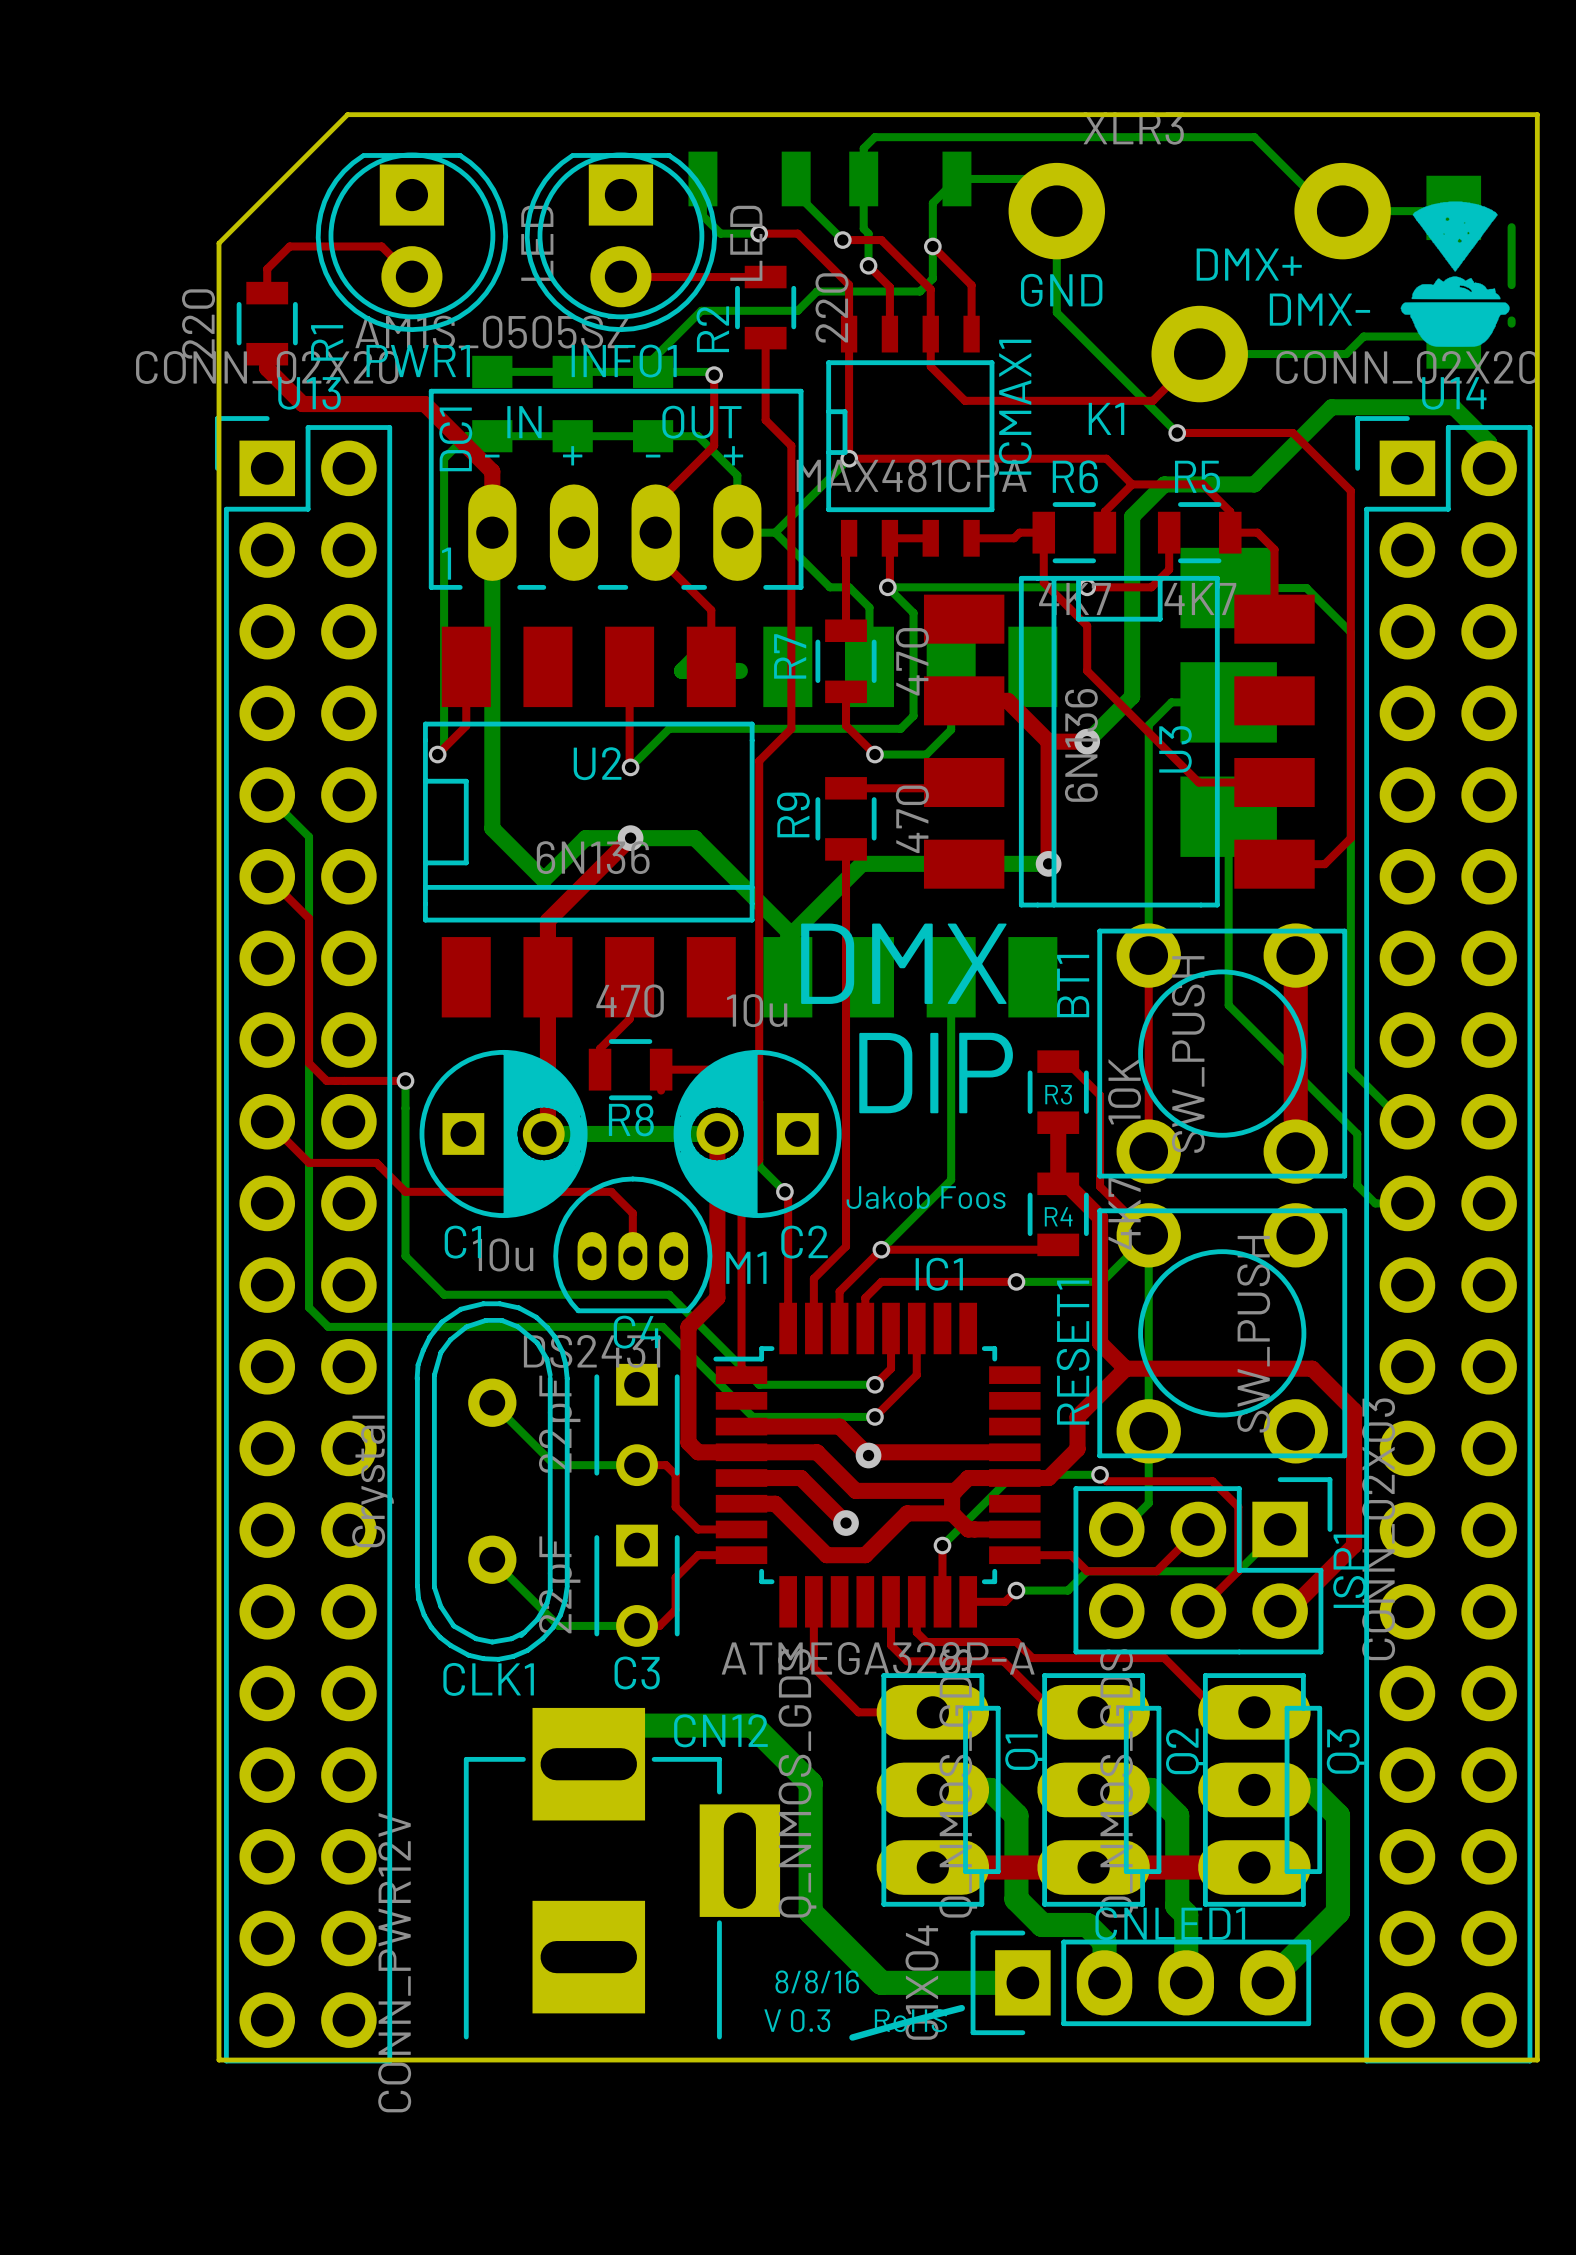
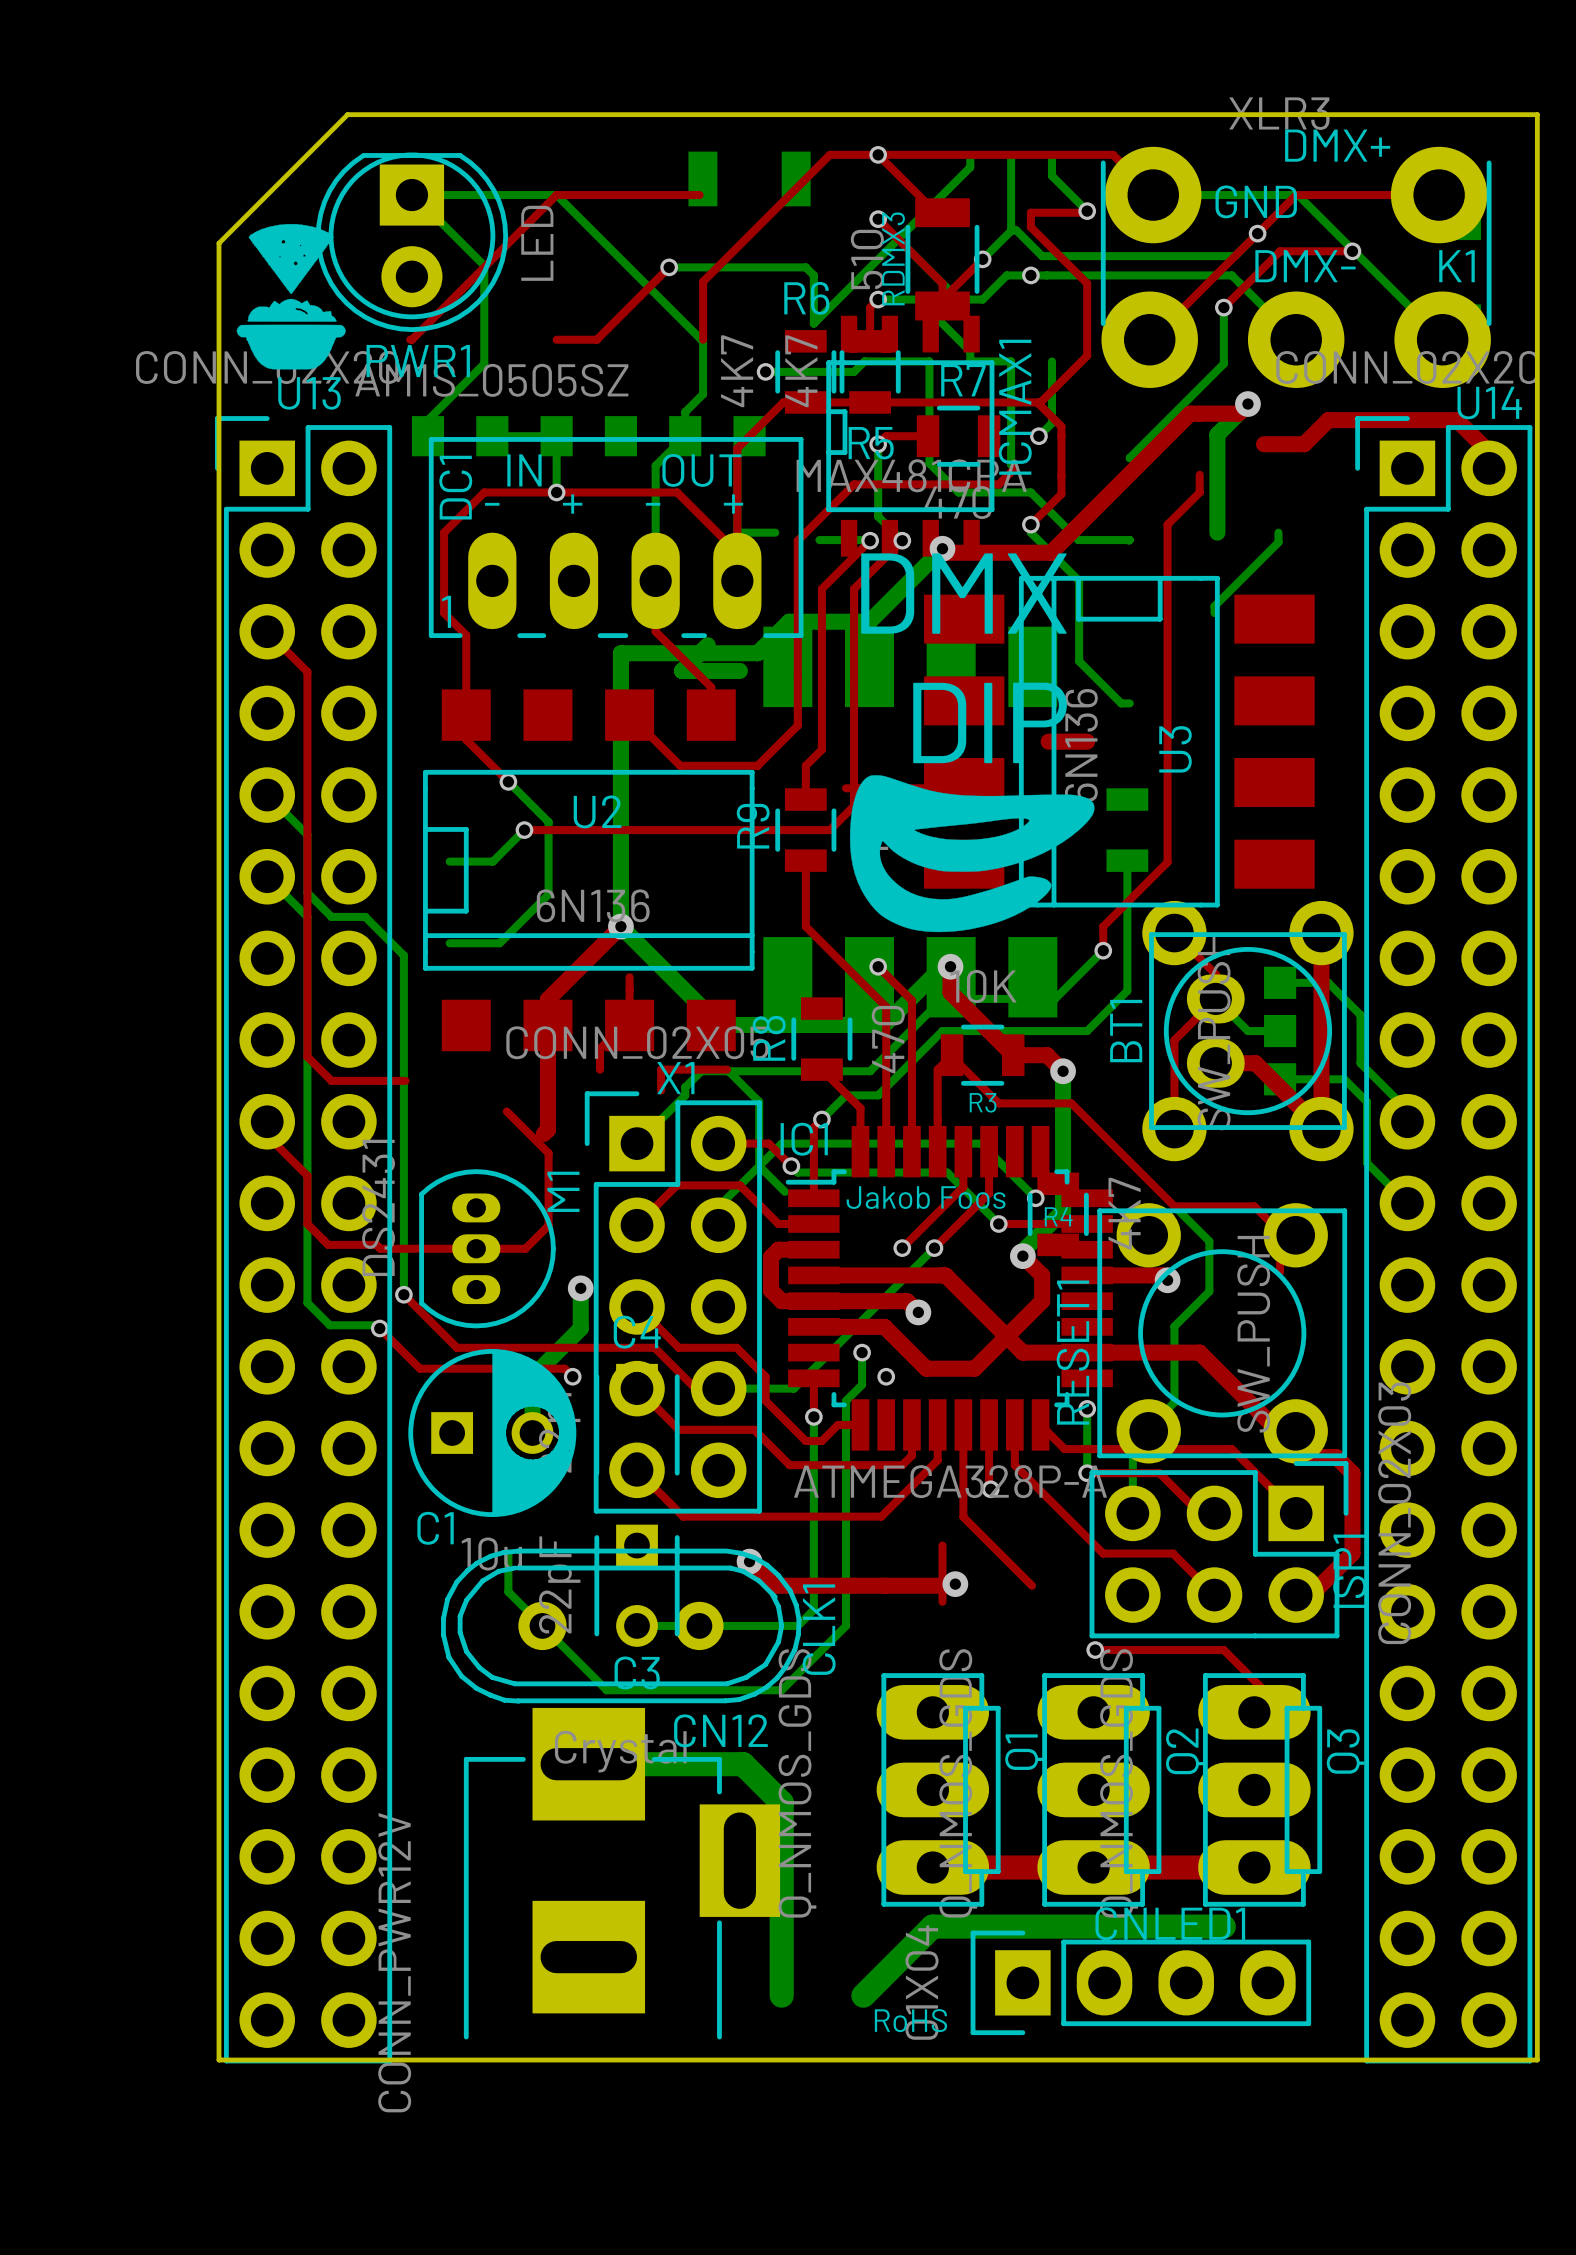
top track: none -> (878, 154) (936, 212) (942, 212)
via: none -> (878, 154)
bottom track: none -> (970, 157) (970, 167) (813, 323) (813, 275) (805, 267) (669, 267)
bottom track: none -> (1011, 157) (1011, 230) (982, 259)
bottom track: none -> (1051, 157) (1051, 175) (1087, 211)
K1 footprint: [1008, 162, 1391, 403] -> [1100, 146, 1492, 388]
bottom track: (702, 178) (702, 215) (720, 233) (759, 233) -> none
bottom track: (796, 178) (796, 193) (842, 240) -> none
RDMX3 side: bottom (910, 178) -> top (942, 259)
top track: none -> (699, 195) (556, 195) (410, 339)
bottom track: none -> (1153, 195) (1297, 195) (1442, 339)
top track: none -> (1153, 195) (1113, 154) (829, 154) (703, 281) (703, 339)
top track: none -> (1439, 195) (1296, 195) (1149, 339)
drawing: [1400, 201, 1510, 347] -> none
bottom track: (1453, 207) (1450, 211) (1328, 211) (1254, 137) (874, 137) (863, 148) (863, 228) (868, 233) (868, 265) -> none
top track: none -> (1087, 211) (1085, 212) (1030, 212) (1030, 227) (1087, 283) (1087, 355) (1040, 402) (783, 402) (737, 448) (737, 580)
via: none -> (1087, 211)
top track: none -> (878, 219) (942, 283) (942, 305)
via: none -> (878, 219)
drawing: none -> [236, 224, 346, 370]
bottom track: (1511, 227) (1511, 285) -> none
bottom track: none -> (1011, 230) (1016, 230) (1042, 256) (1235, 256) (1257, 233)
top track: (759, 233) (797, 233) (849, 284) (849, 458) -> none
via: (759, 233) -> none
via: none -> (1257, 233)
bottom track: none -> (898, 239) (958, 299) (982, 299) (1006, 275) (1231, 275) (1296, 339)
top track: (842, 240) (881, 240) (930, 289) (930, 366) (964, 400) (1152, 400) (1199, 354) -> none
via: (842, 240) -> none
INFO1: LED (620, 242) -> none
top track: (932, 246) (971, 285) (971, 334) -> none
via: (932, 246) -> none
top track: none -> (1352, 251) (1280, 251) (1223, 307)
via: none -> (1352, 251)
top track: none -> (982, 259) (942, 299)
via: none -> (982, 259)
top track: (868, 265) (889, 287) (889, 334) -> none
via: (868, 265) -> none
top track: none -> (669, 267) (596, 339) (556, 339)
via: none -> (669, 267)
via: none -> (1030, 275)
top track: (411, 276) (381, 246) (289, 246) (267, 269) (267, 293) -> none
top track: (621, 277) (765, 277) -> none
bottom track: none -> (878, 299) (918, 299) (970, 351) (970, 361) (1011, 361) (1011, 464) (1014, 468)
top track: none -> (878, 299) (870, 307) (870, 341)
via: none -> (878, 299)
R2 side: top (765, 307) -> bottom (1127, 830)
bottom track: none -> (1223, 307) (1223, 363) (1129, 457)
via: none -> (1223, 307)
bottom track: (1511, 320) (1511, 323) -> none
R1: 220 (267, 323) -> none
bottom track: (1453, 336) (1363, 336) (1346, 354) (1199, 354) -> none
top track: (765, 338) (765, 420) (791, 445) (791, 728) (759, 760) (759, 1159) (741, 1177) (741, 1375) -> none
top track: (267, 354) (267, 368) (302, 404) (424, 404) (492, 471) (492, 532) -> none
bottom track: none -> (1051, 361) (1051, 423) (1038, 436)
bottom track: (492, 371) (710, 371) (714, 375) -> none
bottom track: (653, 371) (653, 359) (701, 310) (797, 310) (817, 291) (919, 291) (932, 278) (932, 203) (956, 178) (1024, 178) (1056, 211) (1056, 312) (1177, 432) -> none
bottom track: none -> (765, 371) (854, 371) (864, 361) (929, 361) (929, 463) (958, 492) (1030, 492) (1078, 540) (1129, 540)
top track: (714, 375) (714, 445) (655, 504) (655, 554) (711, 610) (711, 666) -> none
via position: (714, 375) -> (765, 371)
U14 name position: U14 (1454, 393) -> U14 (1489, 403)
top track: none -> (1038, 402) (1061, 426) (1061, 494) (1030, 524)
part rotation: 0° (492, 404) -> 90° clockwise (460, 436)
part: (572, 404) -> none
part: (653, 404) -> none
bottom track: none -> (1247, 404) (1217, 434) (1217, 532)
top track: none -> (1247, 404) (1238, 413) (1190, 413) (1051, 552) (946, 552) (942, 548)
via: none -> (1247, 404)
K1 name position: K1 (1106, 418) -> K1 (1456, 266)
top track: (1177, 432) (1292, 432) (1350, 490) (1350, 838) (1324, 864) (1274, 864) -> none
via: (1177, 432) -> none
bottom track: none -> (428, 436) (428, 420) (484, 363) (484, 265) (413, 195) (556, 195) (703, 339) (703, 394) (685, 412) (685, 436) (655, 465) (655, 580)
bottom track: (492, 436) (466, 436) (444, 458) (444, 748) (437, 754) -> none
bottom track: (556, 436) (698, 436) (737, 475) -> (556, 436) (556, 492)
part: none -> (588, 436)
part: none -> (717, 436)
top track: none -> (928, 436) (886, 436) (878, 444)
via: none -> (1038, 436)
bottom track: none -> (878, 444) (878, 516) (902, 540)
top track: none -> (1263, 444) (1304, 444) (1328, 420) (1456, 420) (1489, 452) (1489, 468)
bottom track: (849, 458) (775, 532) (829, 587) (849, 587) (869, 607) (869, 666) -> none
top track: (849, 458) (1106, 458) (1132, 484) -> none
via position: (849, 458) -> (878, 444)
top track: none -> (1014, 468) (998, 484) (854, 484) (797, 540) (797, 725) (757, 765) (680, 765) (629, 715)
bottom track: (1489, 468) (1489, 442) (1453, 407) (1331, 407) (1254, 484) (1164, 484) (1132, 516) (1132, 696) (1087, 741) -> none
top track: none -> (1199, 474) (1199, 492) (1167, 524) (1167, 862) (1103, 926) (1103, 950)
R5 name position: R5 (1197, 476) -> R5 (871, 443)
top track: (1132, 484) (1104, 511) (1104, 532) -> none
top track: (1132, 484) (1202, 484) (1230, 511) (1230, 532) (1257, 532) (1274, 549) (1274, 619) -> none
DC1 position: (616, 489) -> (616, 537)
via: none -> (556, 492)
bottom track: none -> (1030, 524) (1030, 532) (1079, 580) (1079, 661) (1121, 703) (1129, 703)
via: none -> (1030, 524)
bottom track: (492, 532) (492, 828) (543, 879) (585, 838) (694, 838) (787, 931) (787, 977) -> none
R6 rotation: 0° (1074, 532) -> 90° clockwise (805, 371)
R6 position: (1074, 532) -> (805, 371)
top track: (1169, 532) (1169, 569) (1151, 587) (1087, 587) -> none
R5 rotation: 0° (1199, 532) -> 90° clockwise (870, 371)
R5 position: (1199, 532) -> (870, 371)
bottom track: none -> (1278, 532) (1278, 542) (1214, 606) (1214, 613)
top track: (849, 538) (846, 541) (846, 630) -> none
top track: (930, 538) (889, 538) (889, 585) (887, 587) -> none
top track: (971, 538) (1014, 538) (1019, 532) (1043, 532) (1043, 582) (1087, 625) (1087, 670) (1198, 782) (1274, 782) -> none
bottom track: none -> (819, 540) (870, 540)
top track: none -> (870, 540) (821, 588) (821, 749) (805, 765) (805, 799)
via: none -> (870, 540)
top track: none -> (902, 540) (854, 588) (854, 805) (829, 830) (524, 830)
via: none -> (902, 540)
bottom track: none -> (942, 548) (869, 621) (789, 621) (757, 653) (620, 653) (620, 926) (719, 1024) (884, 1024) (942, 966) (950, 966)
via: none -> (942, 548)
top track: none -> (737, 552) (677, 492) (484, 492) (444, 532) (444, 613) (466, 635) (466, 666)
top track: none -> (655, 580) (655, 631) (711, 687) (711, 715)
via: (887, 587) -> none
bottom track: (1087, 587) (887, 587) (913, 613) (913, 715) (900, 728) (669, 728) (630, 767) -> none
via: (1087, 587) -> none
bottom track: (1228, 588) (1306, 588) (1350, 632) (1350, 1069) (1402, 1121) (1407, 1121) -> (1280, 982) (1328, 982) (1360, 1014) (1360, 1063) (1407, 1110) (1407, 1121)
U2 footprint: [423, 626, 755, 1018] -> [423, 689, 755, 1052]
R7 rotation: 0° (846, 661) -> 90° clockwise (958, 436)
R7 position: (846, 661) -> (958, 436)
top track: (629, 666) (630, 767) -> none
bottom track: (951, 666) (951, 729) (926, 754) (874, 754) -> none
top track: (846, 691) (846, 725) (874, 754) -> none
top track: (964, 700) (1007, 700) (1048, 741) (1048, 863) -> none
bottom track: (1228, 702) (1171, 702) (1148, 725) (1148, 955) -> none
part: (1228, 702) -> none
top track: (466, 725) (437, 754) -> (466, 725) (466, 739) (508, 781)
via: (1087, 741) -> none
via: (437, 754) -> none
via: (874, 754) -> none
via: (630, 767) -> none
drawing: none -> [849, 775, 1095, 933]
bottom track: none -> (508, 781) (548, 822) (548, 894) (499, 943) (449, 943)
via: none -> (508, 781)
bottom track: (267, 795) (309, 836) (309, 1307) (328, 1326) (662, 1326) (752, 1416) (874, 1416) -> (267, 795) (307, 834) (307, 892) (331, 916) (365, 916) (403, 955) (403, 1294)
bottom track: (1228, 816) (1228, 1005) (1357, 1133) (1357, 1185) (1375, 1203) (1407, 1203) -> (1280, 1079) (1344, 1079) (1366, 1101) (1366, 1162) (1407, 1203)
R9 position: (846, 818) -> (805, 830)
bottom track: none -> (524, 830) (492, 861) (449, 861)
via: none -> (524, 830)
top track: (630, 838) (547, 920) (547, 999) -> (620, 926) (547, 999)
via position: (630, 838) -> (620, 926)
top track: (846, 849) (846, 1246) (813, 1278) (813, 1328) -> none
top track: none -> (805, 860) (805, 926) (886, 1006) (886, 1151)
bottom track: none -> (1127, 860) (1127, 990) (1087, 1031) (942, 1031) (878, 1095) (846, 1095) (821, 1119)
bottom track: (1048, 863) (862, 863) (787, 938) -> none
via: (1048, 863) -> none
bottom track: none -> (267, 876) (307, 916) (307, 1302) (329, 1325) (379, 1325) (379, 1328)
top track: (267, 876) (309, 918) (309, 1063) (326, 1080) (331, 1080) -> (267, 631) (307, 671) (307, 1056) (331, 1080)
BT1 footprint: [1097, 923, 1348, 1184] -> [1142, 900, 1354, 1162]
top track: none -> (1174, 933) (1215, 974) (1215, 998) (1174, 1040) (1174, 1129)
top track: none -> (1321, 933) (1321, 1129) (1255, 1063) (1215, 1063)
bottom track: none -> (1103, 950) (1055, 998) (942, 998) (870, 1071) (701, 1071) (685, 1087) (685, 1095) (637, 1143)
via: none -> (1103, 950)
top track: (1148, 955) (1148, 1151) -> none
top track: (1295, 955) (1295, 1151) -> none
text position: DMX (903, 963) -> DMX (963, 593)
top track: none -> (878, 966) (911, 1000) (911, 1151)
via: none -> (878, 966)
top track: none -> (950, 966) (950, 992) (1013, 1055) (1046, 1055) (1063, 1071)
via: none -> (950, 966)
bottom track: (951, 977) (951, 1179) (881, 1249) -> none
BT1 name position: BT1 (1073, 986) -> BT1 (1126, 1031)
bottom track: none -> (1215, 998) (1247, 1031) (1280, 1031)
part: none -> (1280, 1031)
top track: (1058, 1061) (1066, 1061) (1100, 1095) (1100, 1186) (1148, 1235) -> none
R8 rotation: 0° (630, 1069) -> 90° clockwise (821, 1039)
R8 position: (630, 1069) -> (821, 1039)
top track: none -> (821, 1069) (860, 1108) (860, 1151)
bottom track: none -> (1063, 1071) (1063, 1211) (1022, 1251) (1022, 1256) (1020, 1253)
via: none -> (1063, 1071)
text position: DIP (936, 1073) -> DIP (990, 722)
bottom track: (405, 1080) (405, 1256) (444, 1294) (669, 1294) (759, 1384) (874, 1384) -> none
via: (405, 1080) -> none
R3 value position: 10K (1124, 1091) -> 10K (983, 986)
R3 rotation: 0° (1058, 1092) -> 90° clockwise (982, 1055)
R3 position: (1058, 1092) -> (982, 1055)
top track: none -> (821, 1119) (813, 1127) (813, 1198)
via: none -> (821, 1119)
top track: (267, 1121) (309, 1162) (376, 1162) (405, 1191) (611, 1191) (632, 1213) (632, 1256) -> (267, 1121) (267, 1135) (307, 1175) (307, 1224) (328, 1244) (376, 1244) (380, 1248) (525, 1248) (548, 1225) (548, 1153) (506, 1111)
top track: (1058, 1122) (1058, 1183) (1066, 1183) (1100, 1217) (1100, 1342) (1125, 1368) -> none
C1 position: (503, 1133) -> (492, 1433)
bottom track: (543, 1133) (717, 1133) -> none
top track: (717, 1133) (717, 1297) (688, 1326) (688, 1442) (698, 1452) (817, 1452) (855, 1490) (955, 1490) -> none
C2: 10u (757, 1133) -> none
top track: none -> (718, 1143) (768, 1143) (791, 1166)
top track: none -> (937, 1151) (937, 1069) (952, 1055) (998, 1103) (1071, 1103) (1174, 1206) (1254, 1206) (1280, 1232) (1280, 1272)
top track: none -> (963, 1151) (963, 1187) (902, 1248)
top track: none -> (989, 1151) (989, 1193) (934, 1248)
bottom track: none -> (791, 1166) (797, 1172) (947, 1172) (998, 1224)
top track: (784, 1191) (788, 1195) (788, 1328) -> none
via position: (784, 1191) -> (791, 1166)
bottom track: none -> (1035, 1198) (981, 1143) (781, 1143) (718, 1206) (718, 1225) (724, 1225)
via: none -> (1035, 1198)
bottom track: none -> (1174, 1206) (1209, 1241) (1209, 1291) (1174, 1326) (1174, 1402) (1132, 1444) (1132, 1513)
top track: none -> (813, 1224) (778, 1224) (739, 1185) (676, 1185) (637, 1225)
top track: none -> (998, 1224) (1087, 1224)
via: none -> (998, 1224)
C1 name position: C1 (462, 1242) -> C1 (435, 1528)
M1 rotation: 0° (632, 1244) -> 90° clockwise (487, 1248)
M1 position: (632, 1244) -> (487, 1248)
top track: (1058, 1244) (1053, 1249) (881, 1249) (839, 1291) (839, 1328) -> none
bottom track: none -> (934, 1248) (793, 1388) (718, 1388)
via: none -> (934, 1248)
top track: none -> (813, 1249) (778, 1249) (771, 1257) (771, 1290) (781, 1301) (907, 1301) (918, 1312)
via position: (881, 1249) -> (902, 1248)
top track: none -> (1022, 1256) (1042, 1275) (1042, 1301) (974, 1368) (926, 1368) (884, 1326) (813, 1326)
via: none -> (1022, 1256)
M1 name position: M1 (746, 1267) -> M1 (563, 1191)
IC1 name position: IC1 (939, 1274) -> IC1 (804, 1139)
top track: none -> (813, 1275) (945, 1275) (1022, 1352) (1199, 1352) (1304, 1457) (1336, 1457) (1352, 1473) (1352, 1553) (1310, 1595) (1296, 1595)
top track: none -> (1087, 1275) (1162, 1275) (1167, 1280)
via: none -> (1167, 1280)
bottom track: (1016, 1281) (1102, 1281) (1148, 1235) (1148, 1503) (1122, 1529) (1116, 1529) -> none
top track: (1016, 1281) (881, 1281) (865, 1297) (865, 1328) -> none
via: (1016, 1281) -> none
bottom track: none -> (580, 1288) (580, 1328) (532, 1376) (532, 1433)
via: none -> (580, 1288)
top track: none -> (403, 1294) (456, 1347) (654, 1347) (695, 1388) (718, 1388)
via: none -> (403, 1294)
X1: none -> CONN_02X05 (673, 1302)
top track: none -> (637, 1306) (678, 1347) (736, 1347) (765, 1376) (765, 1400) (805, 1441) (821, 1441) (837, 1424) (860, 1424)
via: none -> (918, 1312)
top track: none -> (379, 1328) (419, 1368) (564, 1368) (572, 1376)
via: none -> (379, 1328)
top track: (891, 1328) (891, 1368) (874, 1384) -> none
top track: (916, 1328) (916, 1375) (874, 1416) -> none
bottom track: none -> (862, 1352) (862, 1384) (846, 1400) (846, 1625) (781, 1690) (606, 1690) (508, 1591) (508, 1553)
via: none -> (862, 1352)
top track: (1125, 1368) (1312, 1368) (1354, 1410) (1354, 1545) (1288, 1611) (1278, 1611) -> none
top track: (1125, 1368) (1077, 1416) (1077, 1449) (1048, 1478) (968, 1478) (952, 1494) (952, 1513) -> none
via: none -> (572, 1376)
top track: none -> (813, 1378) (813, 1416)
via position: (874, 1384) -> (886, 1376)
top track: none -> (637, 1388) (678, 1429) (754, 1429) (789, 1465) (902, 1465) (911, 1455) (911, 1424)
bottom track: (492, 1402) (554, 1465) (637, 1465) -> none
bottom track: none -> (1087, 1408) (1087, 1473)
via: none -> (1087, 1408)
bottom track: none -> (813, 1416) (813, 1609) (797, 1625) (637, 1625)
via: none -> (813, 1416)
via: (874, 1416) -> none
top track: none -> (937, 1424) (937, 1460) (881, 1516) (683, 1516) (637, 1470)
top track: none -> (963, 1424) (963, 1517) (1032, 1585)
top track: none -> (989, 1424) (989, 1487) (990, 1489)
top track: none -> (1014, 1424) (1014, 1465) (1103, 1553) (1173, 1553) (1214, 1595)
top track: none -> (1040, 1424) (1064, 1449) (1231, 1449) (1296, 1513)
top track: (741, 1426) (839, 1426) (868, 1455) (871, 1452) (1014, 1452) -> none
via: (868, 1455) -> none
top track: (637, 1465) (665, 1465) (675, 1474) (675, 1506) (698, 1529) (741, 1529) -> none
IC1 position: (876, 1465) -> (949, 1288)
top track: none -> (1087, 1473) (1159, 1473) (1199, 1513) (1214, 1513)
bottom track: (1100, 1474) (1013, 1474) (942, 1545) -> none
top track: (1100, 1474) (1106, 1481) (1212, 1481) (1238, 1506) (1238, 1571) (1198, 1611) -> none
via position: (1100, 1474) -> (1087, 1473)
top track: (741, 1478) (801, 1478) (846, 1523) -> none
CLK1 rotation: 0° (492, 1481) -> 90° counterclockwise (621, 1626)
via: none -> (990, 1489)
top track: (741, 1503) (775, 1503) (826, 1555) (865, 1555) (907, 1513) (952, 1513) -> none
top track: (952, 1513) (968, 1529) (1014, 1529) -> none
via: (846, 1523) -> none
top track: (1198, 1529) (1156, 1571) (1087, 1571) (1071, 1555) (1014, 1555) -> none
bottom track: (1280, 1529) (1238, 1571) (1087, 1571) (1067, 1590) (1016, 1590) -> none
via: (942, 1545) -> none
top track: (741, 1555) (698, 1555) (675, 1577) (675, 1609) (659, 1625) (637, 1625) -> none
bottom track: (492, 1559) (558, 1625) (620, 1625) -> none
top track: none -> (749, 1561) (773, 1585) (953, 1585) (955, 1584)
via: none -> (749, 1561)
ISP1 position: (1202, 1565) -> (1219, 1549)
via: none -> (955, 1584)
top track: (1016, 1590) (1005, 1601) (968, 1601) -> none
via: (1016, 1590) -> none
top track: (813, 1601) (813, 1667) (858, 1712) (932, 1712) -> none
top track: (891, 1601) (891, 1645) (907, 1661) (1003, 1661) (1054, 1712) (1093, 1712) -> none
top track: (916, 1601) (916, 1632) (926, 1642) (1016, 1642) (1032, 1658) (1164, 1658) (1218, 1712) (1254, 1712) -> none
top track: none -> (1095, 1650) (1223, 1650) (1297, 1722)
via: none -> (1095, 1650)
bottom track: none -> (556, 1764) (743, 1764) (781, 1802) (781, 1995)
bottom track: (588, 1764) (627, 1725) (752, 1725) (810, 1783) (810, 1912) (881, 1982) (1022, 1982) -> none
bottom track: (932, 1789) (990, 1789) (1016, 1815) (1016, 1899) (1042, 1924) (1087, 1924) (1104, 1942) (1104, 1982) -> none
bottom track: (1093, 1789) (1151, 1789) (1177, 1815) (1177, 1905) (1186, 1914) (1186, 1982) -> none
bottom track: (1254, 1789) (1312, 1789) (1337, 1815) (1337, 1912) (1267, 1982) -> none
bottom track: none -> (1223, 1926) (932, 1926) (863, 1995)
text: 8/8/16 (817, 1981) -> none
line: (961, 2008) (852, 2037) -> none
text: V 0.3 (797, 2020) -> none

